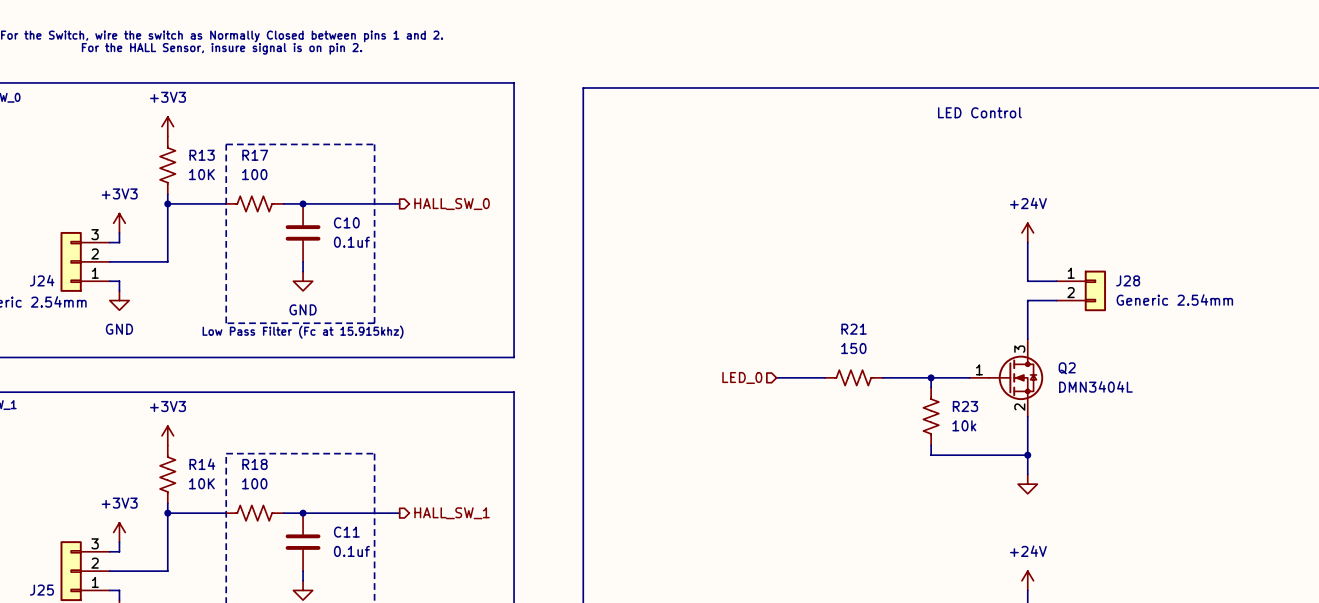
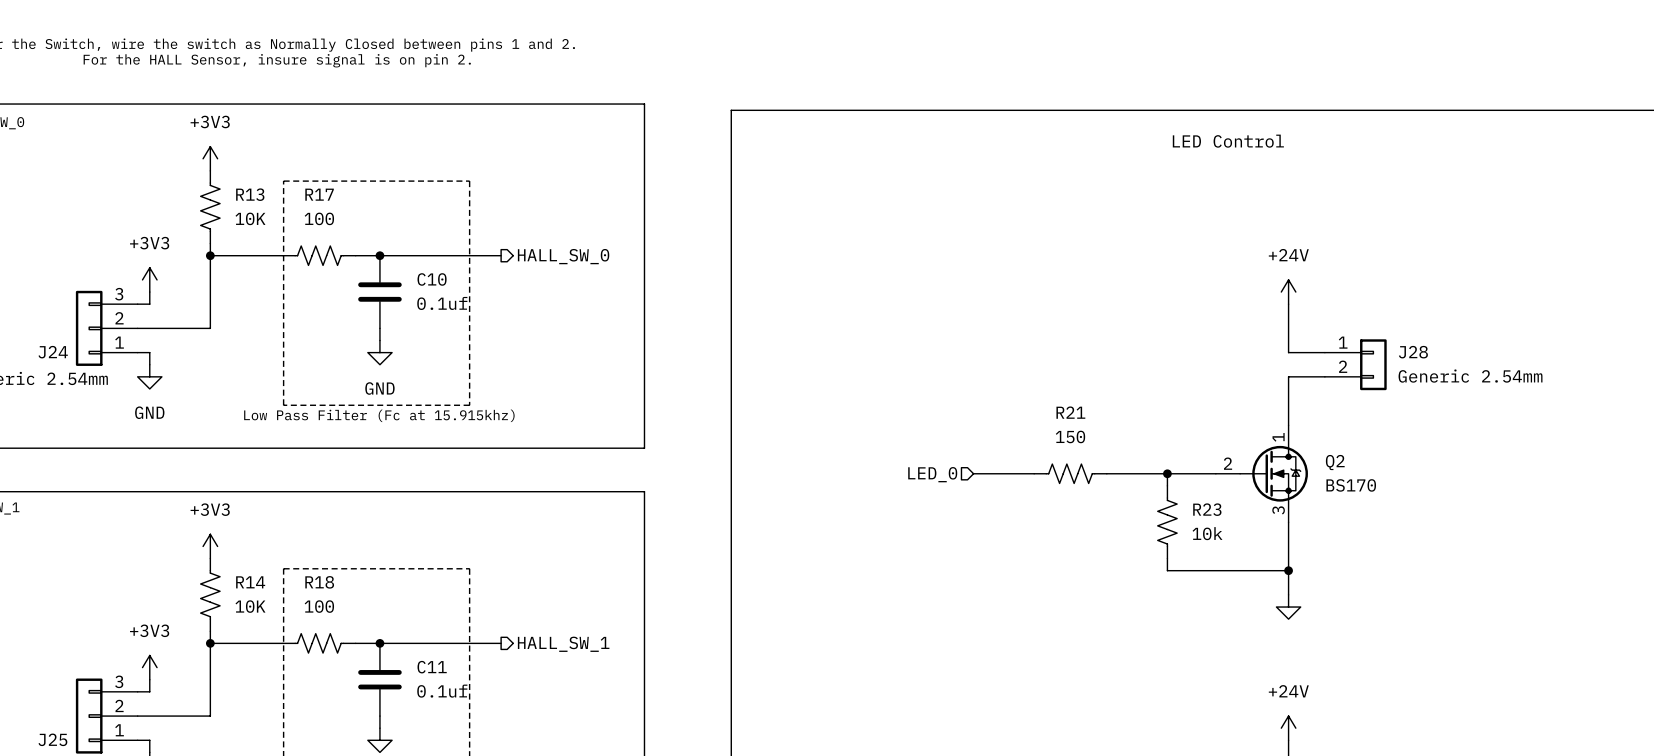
Q2 symbol: [969, 339, 1044, 417] -> [1215, 425, 1308, 523]
Q2 value: DMN3404L (1095, 386) -> BS170 (1351, 485)

